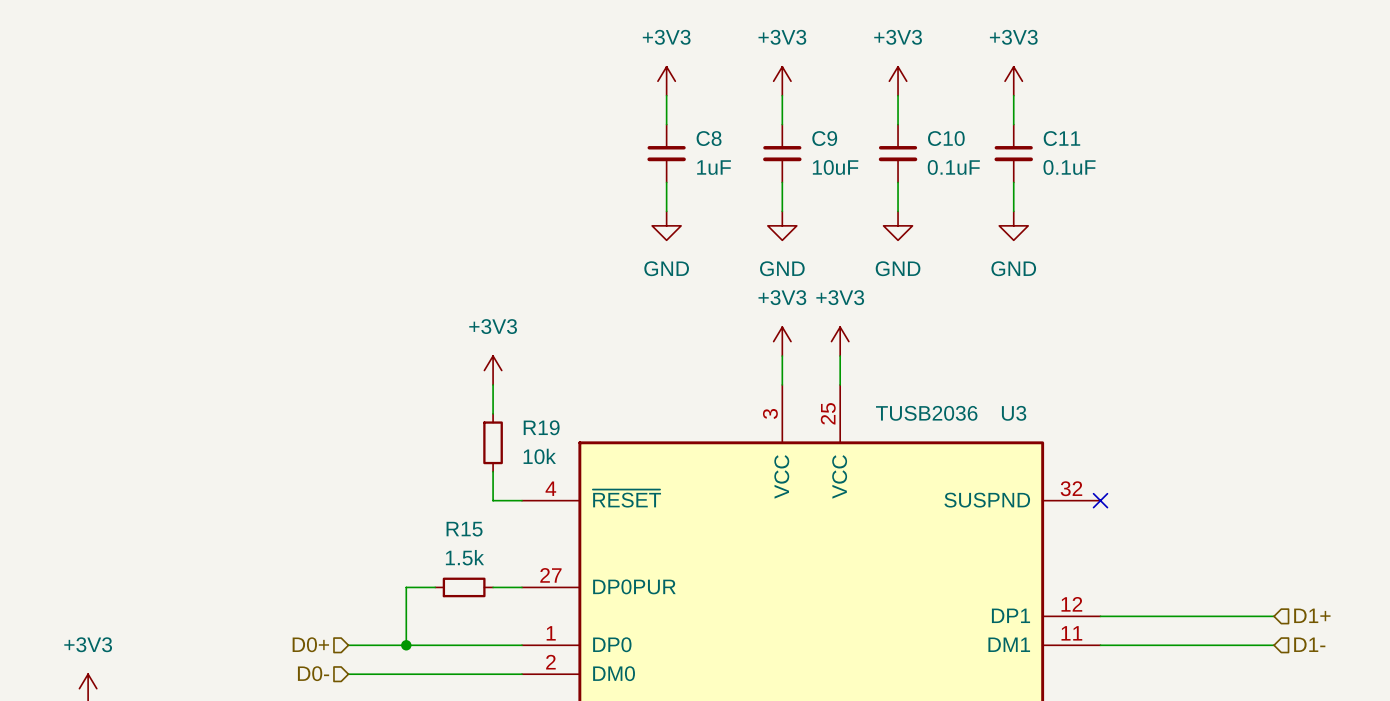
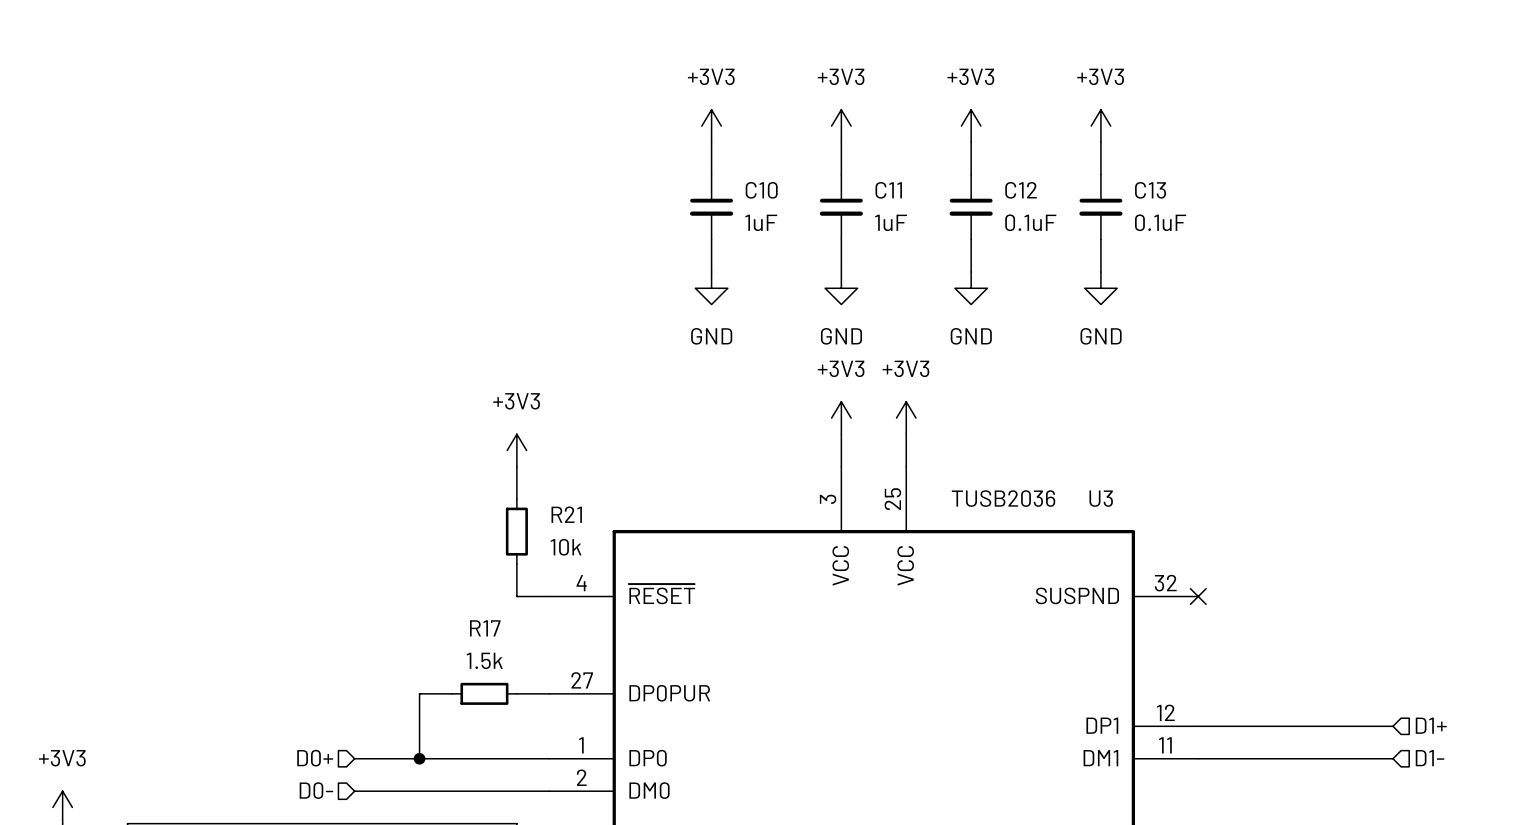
C8 name: C8 (709, 138) -> C10 (761, 190)
C9 name: C9 (824, 138) -> C11 (888, 190)
C10 name: C10 (946, 138) -> C12 (1021, 190)
C11 name: C11 (1061, 138) -> C13 (1150, 190)
C9 value: 10uF (835, 167) -> 1uF (891, 222)
R19 name: R19 (541, 427) -> R21 (566, 514)
R15 name: R15 (464, 529) -> R17 (485, 628)

